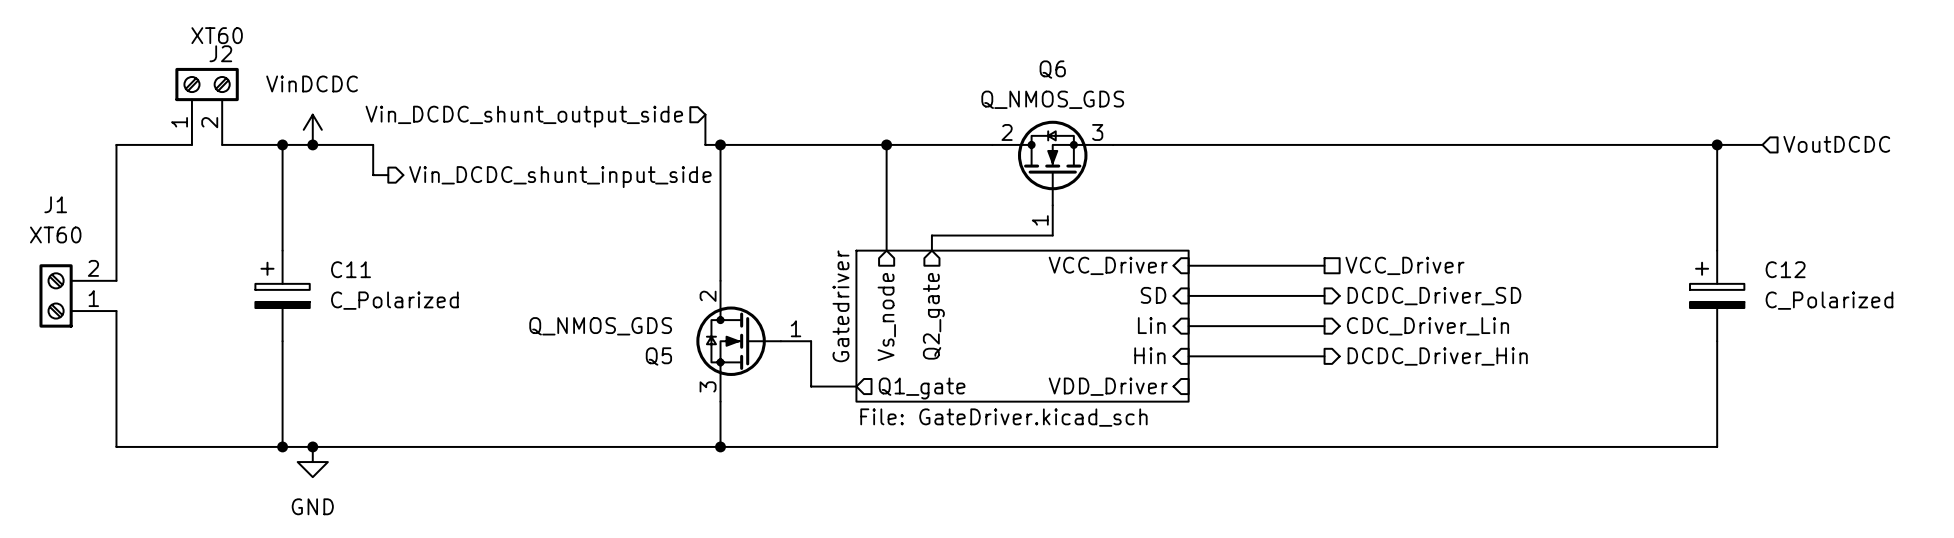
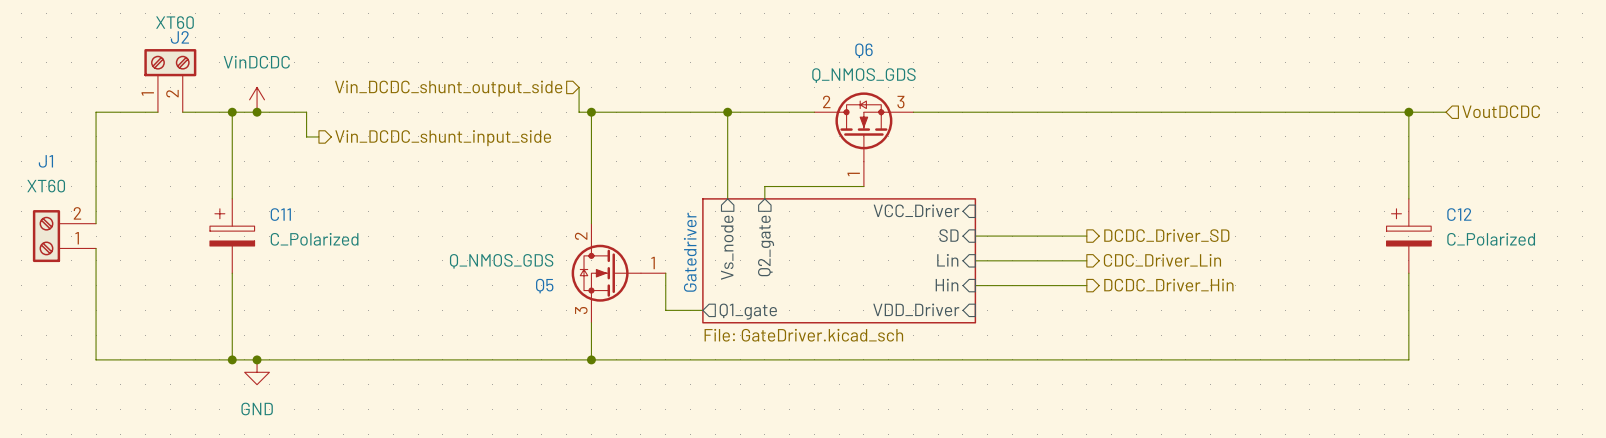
wire: (1188, 265) (1324, 265) -> none
hierarchical label: VCC_Driver (1404, 265) -> none

